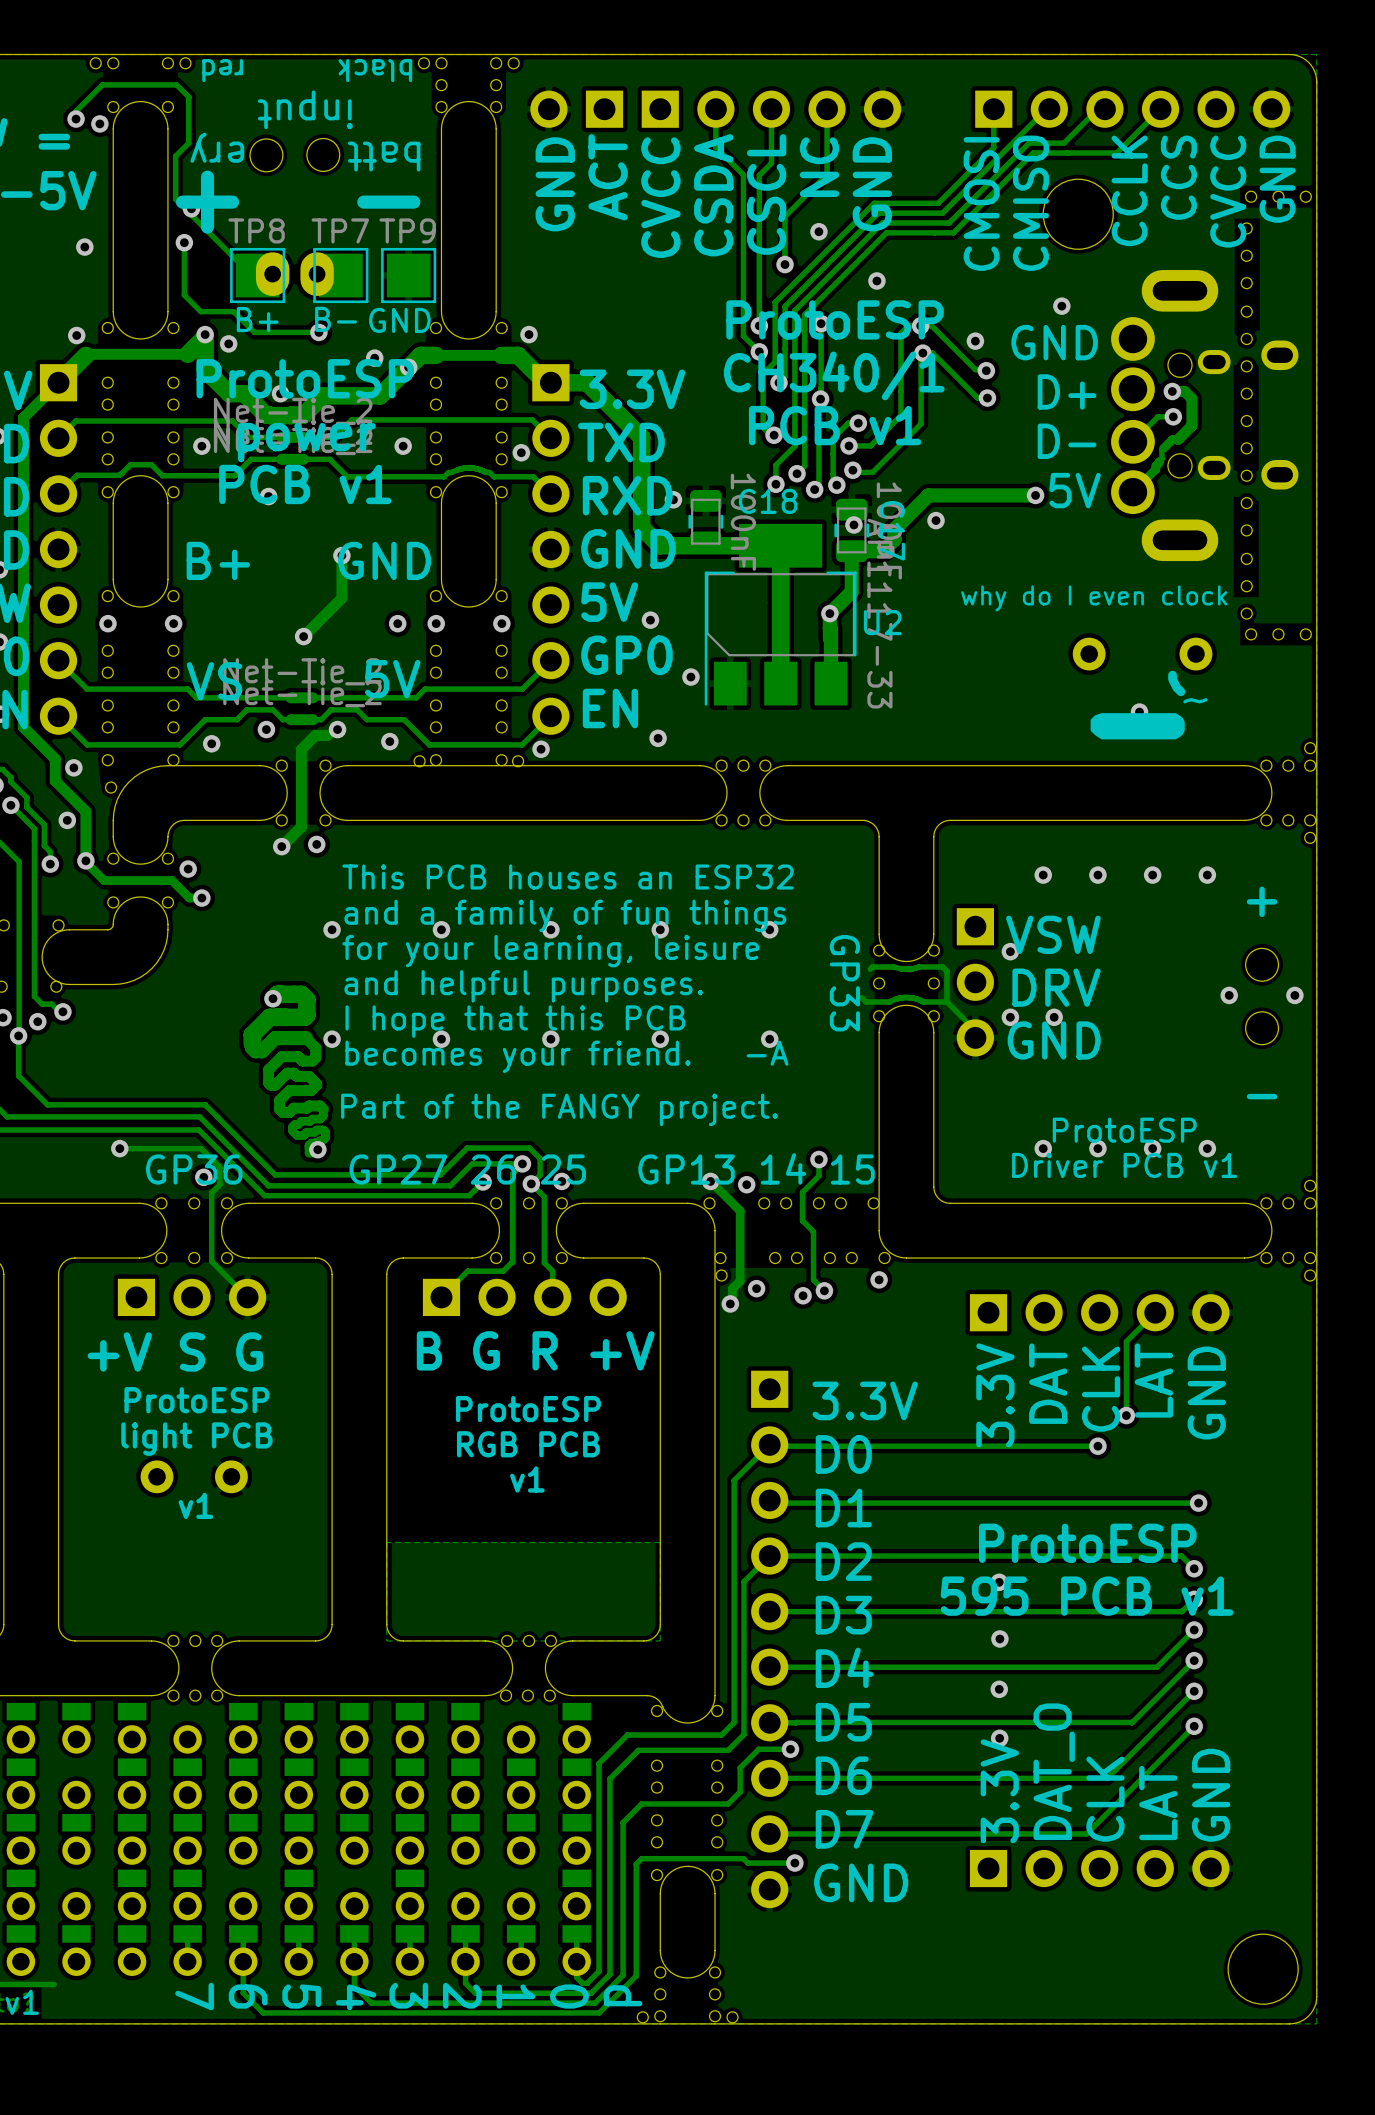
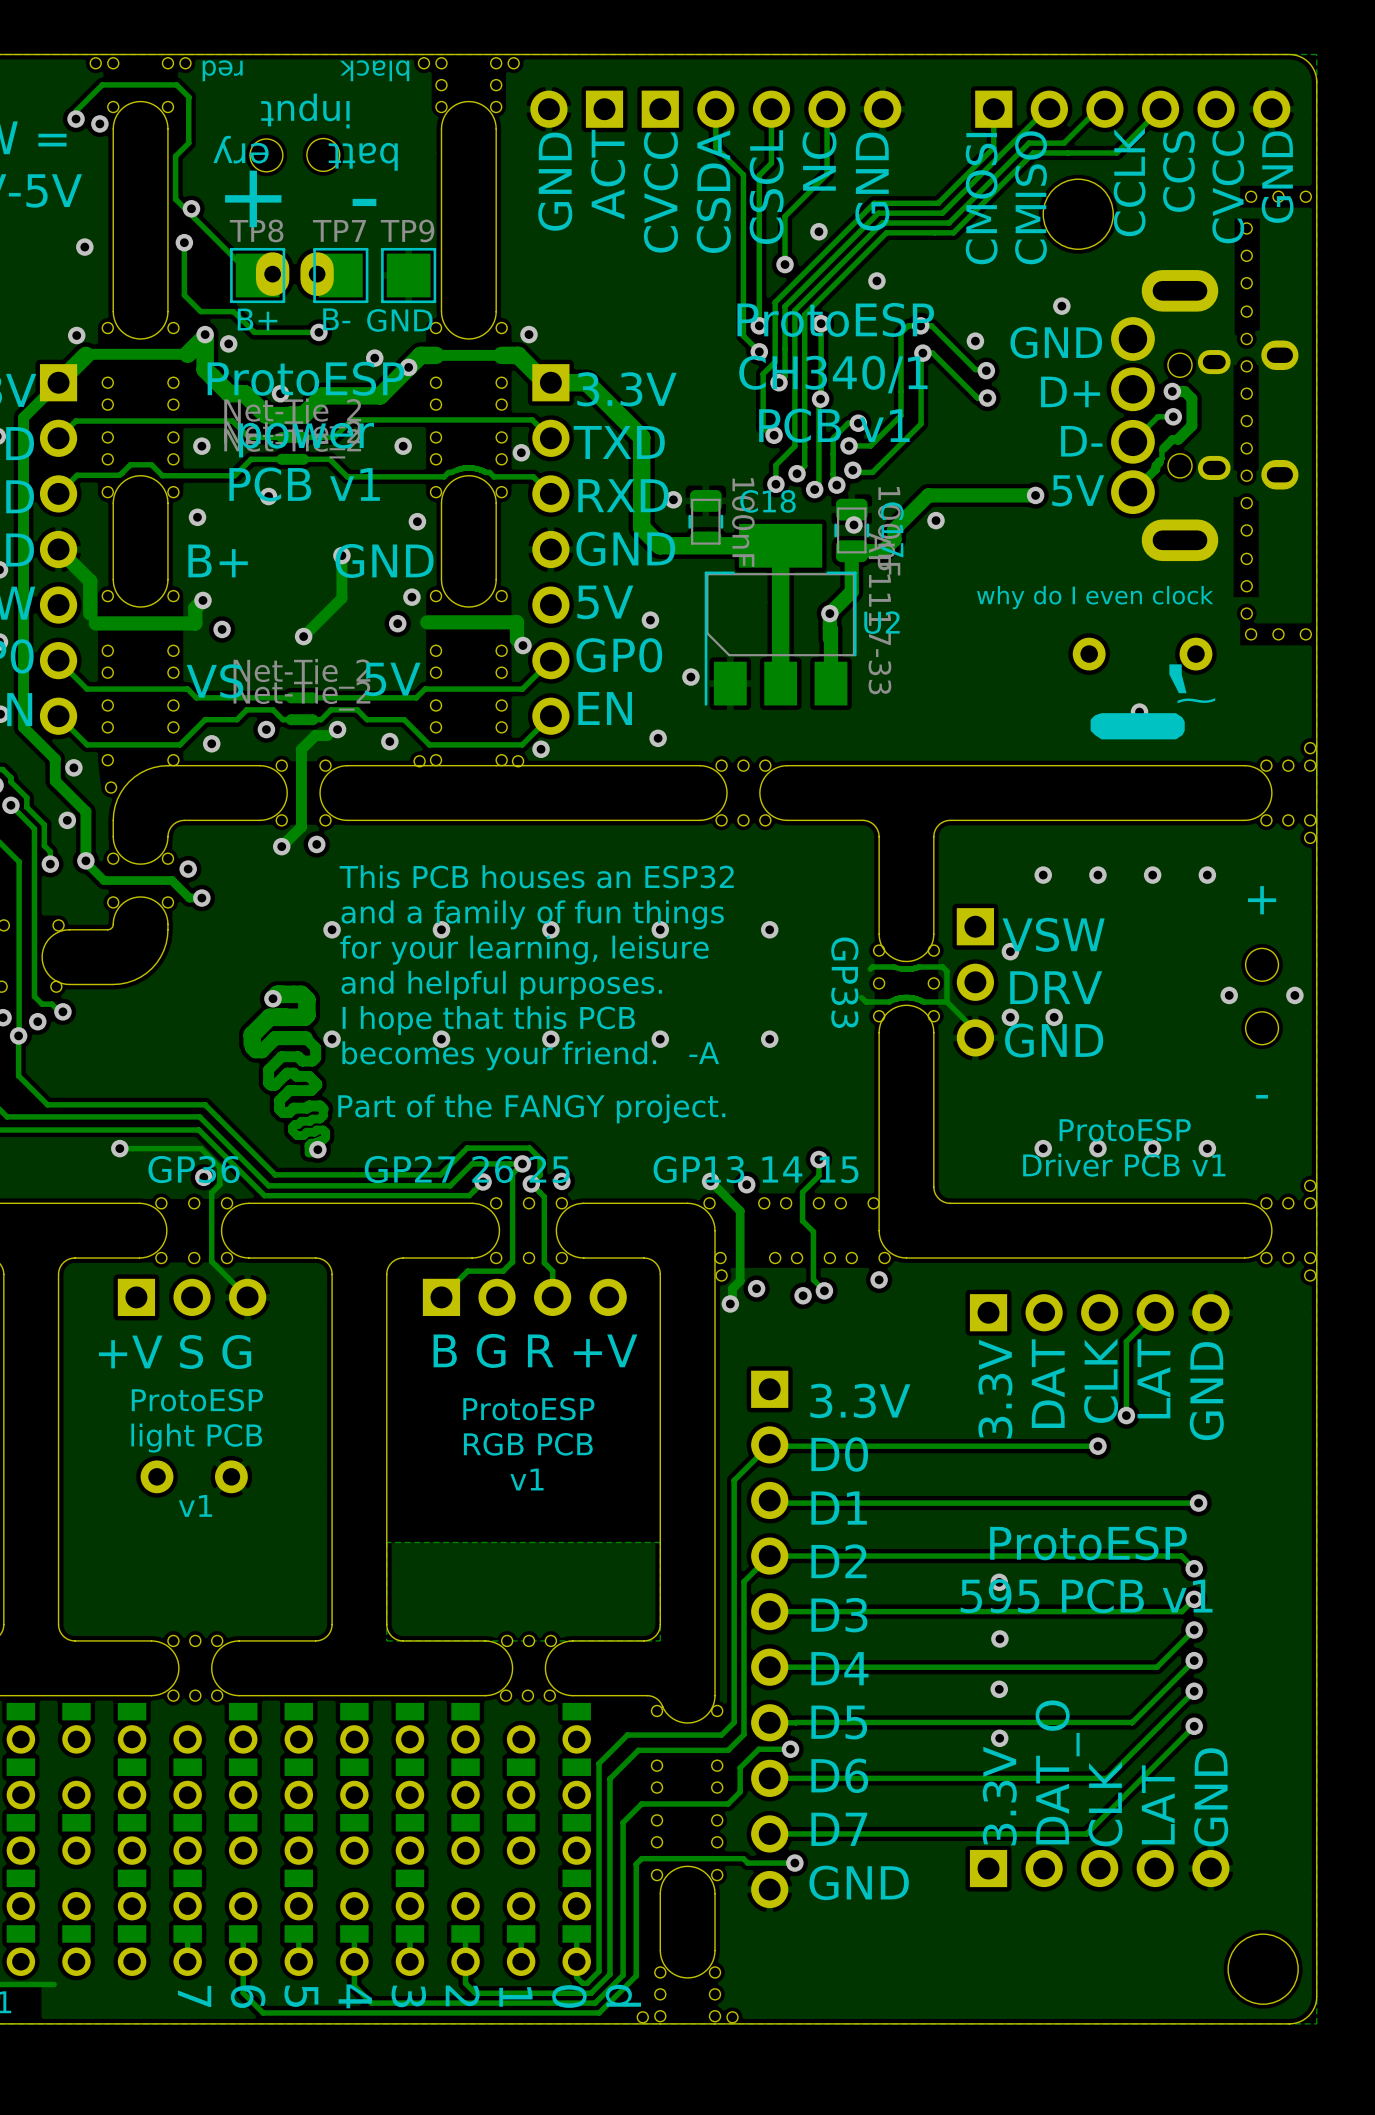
via: none -> (197, 517)
via: none -> (417, 521)
track: none -> (58, 549) (90, 581) (90, 613)
track: none -> (202, 600) (195, 608) (195, 623) (95, 623)
via: none -> (202, 600)
track: none -> (427, 622) (516, 622) (516, 639) (522, 645)
via: (108, 623) -> none
via: (173, 623) -> none
via position: (436, 623) -> (411, 597)
via position: (501, 623) -> (522, 645)
via: none -> (222, 629)

